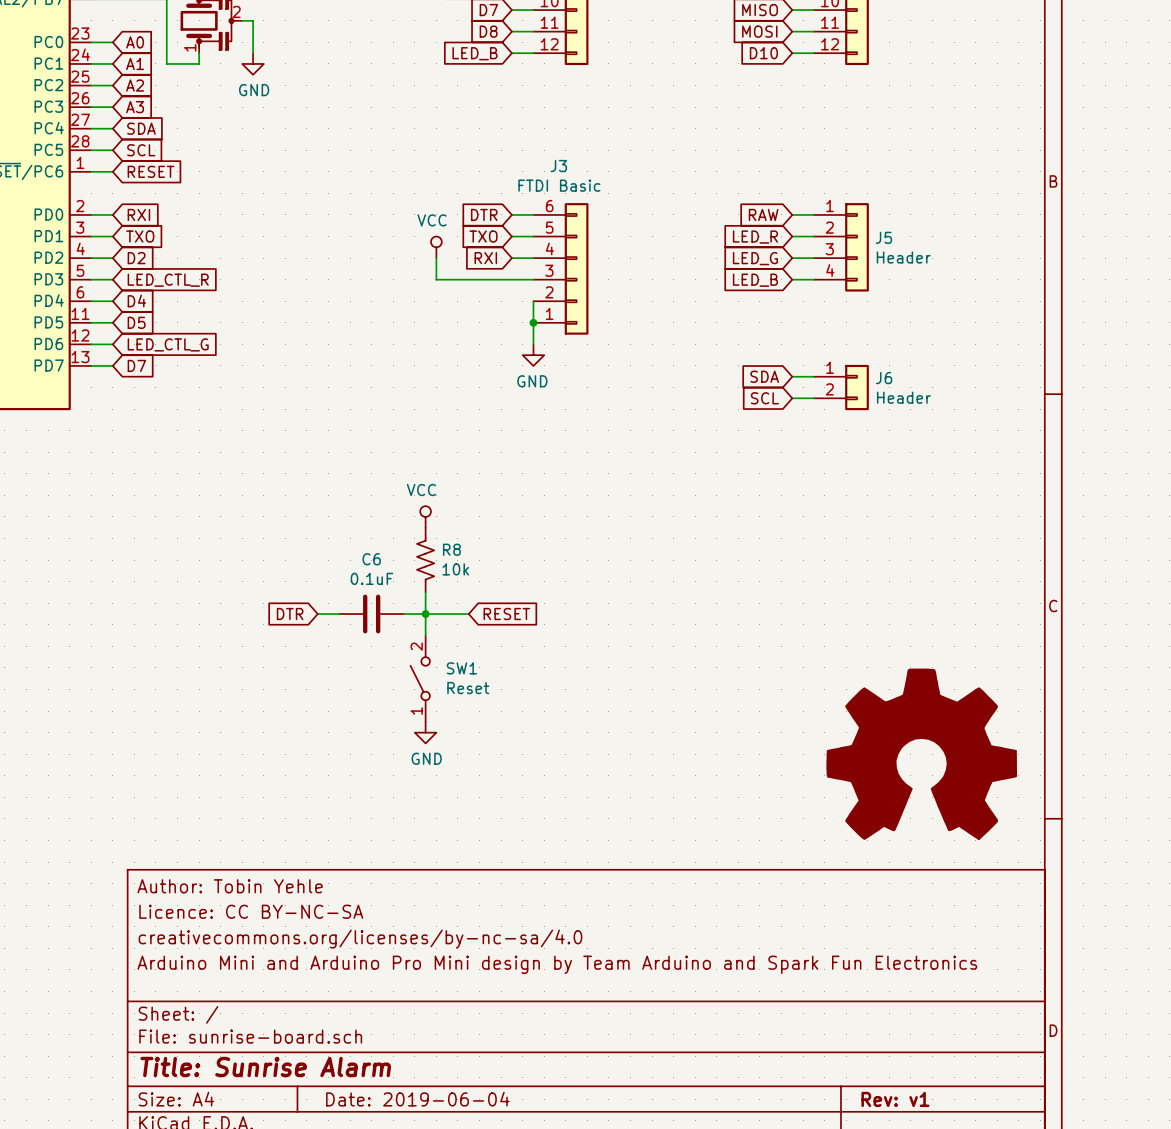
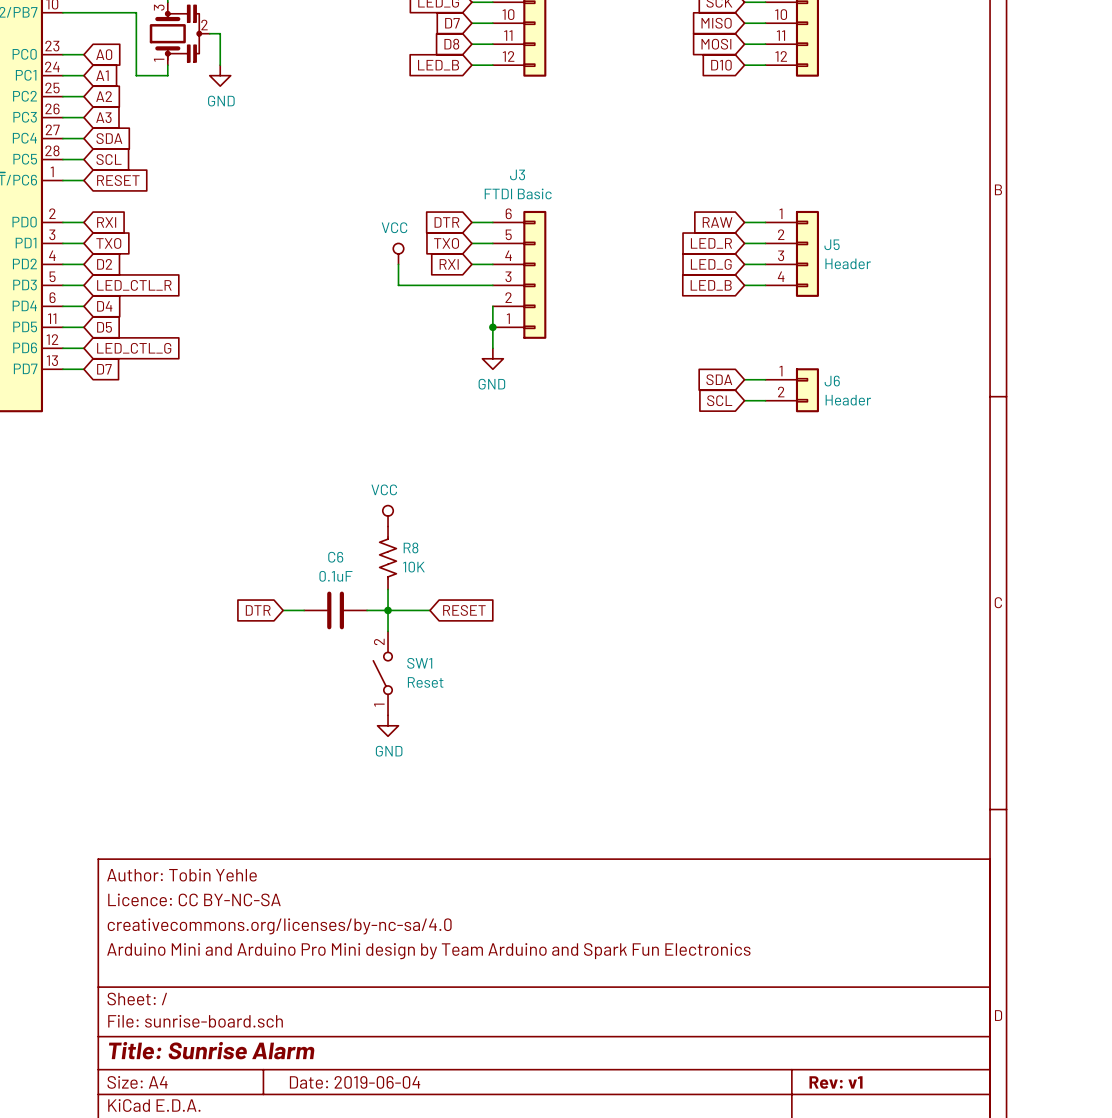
R8 value: 10k (455, 569) -> 10K (413, 567)
power symbol: (921, 754) -> none

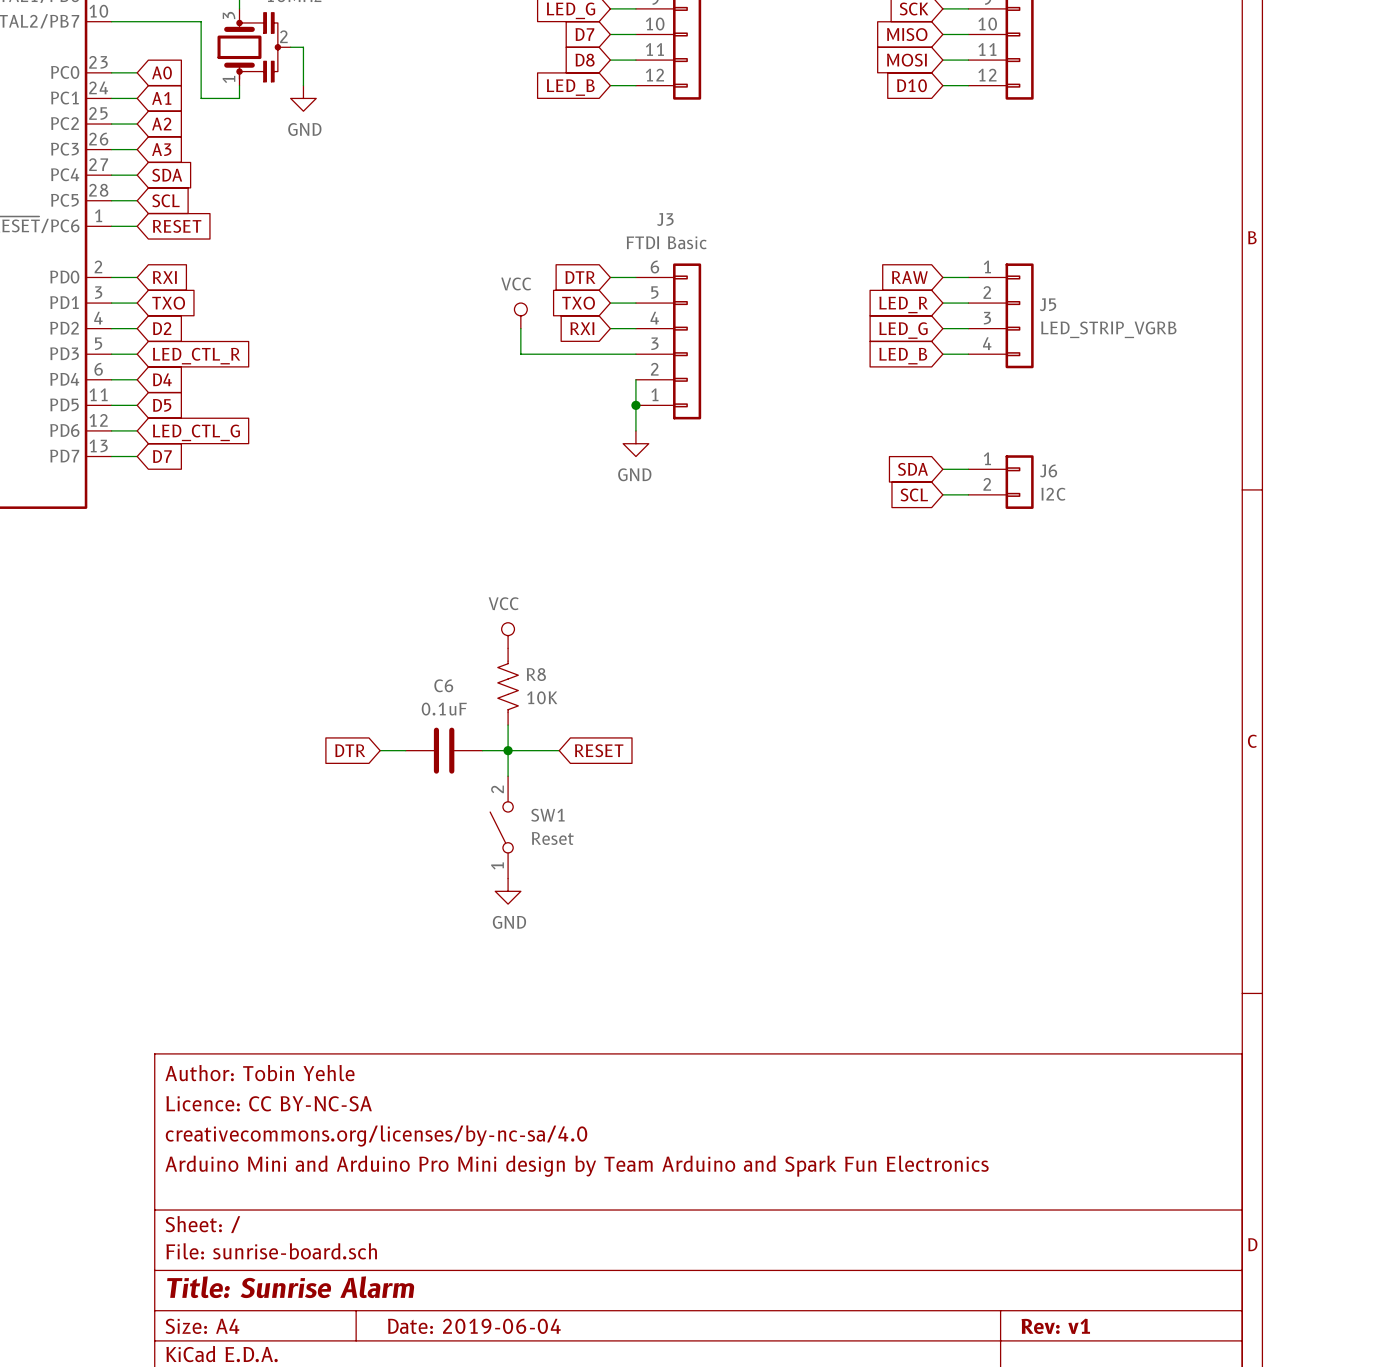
J5 value: Header (848, 263) -> LED_STRIP_VGRB (1108, 329)
J6 value: Header (848, 400) -> I2C (1053, 494)

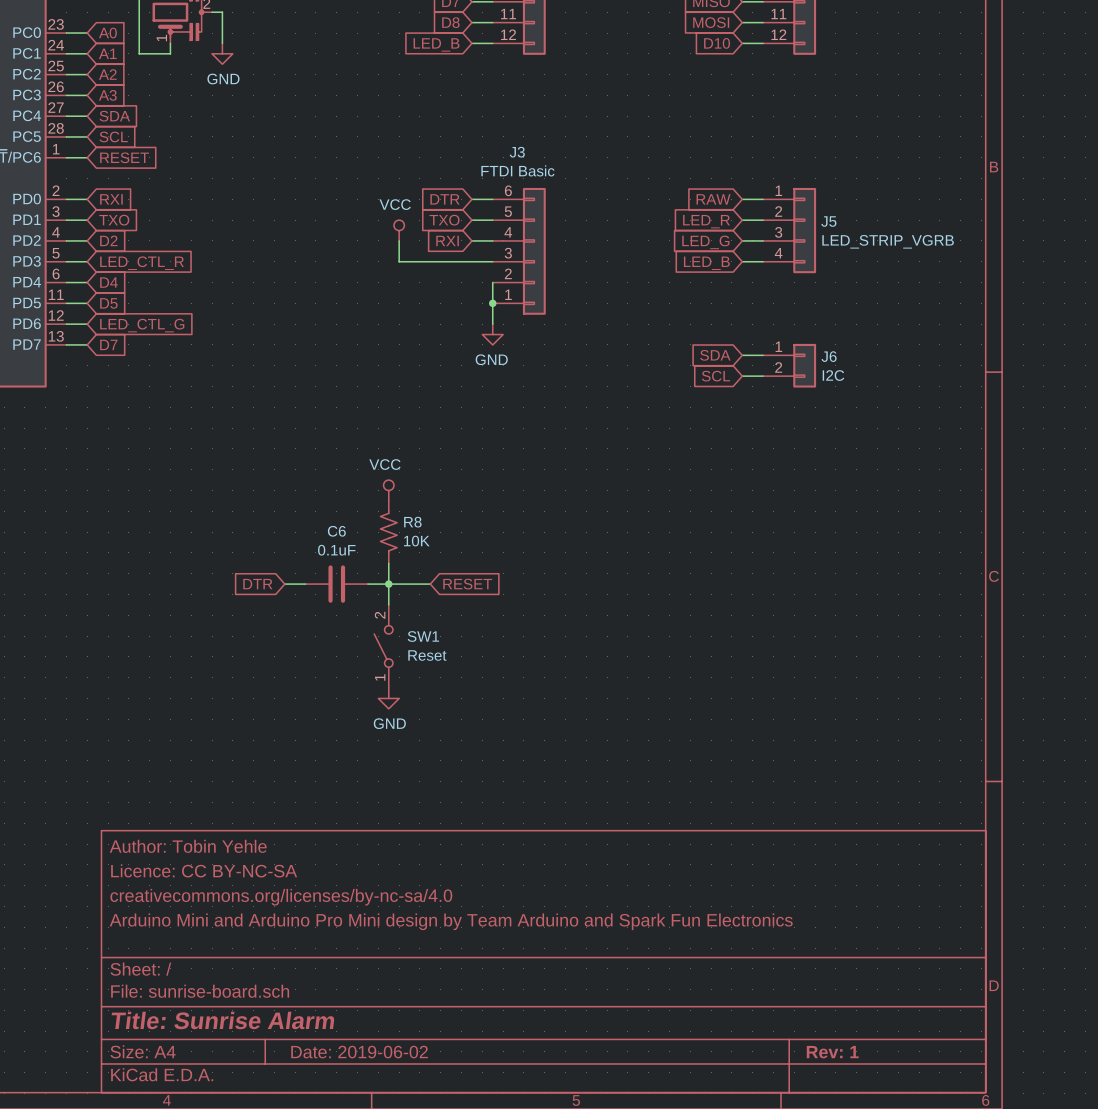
title block: Date: 2019-06-04 (474, 1326) -> Date: 2019-06-02 (359, 1052)
title block: Rev: v1 (1055, 1326) -> Rev: 1 (832, 1052)

